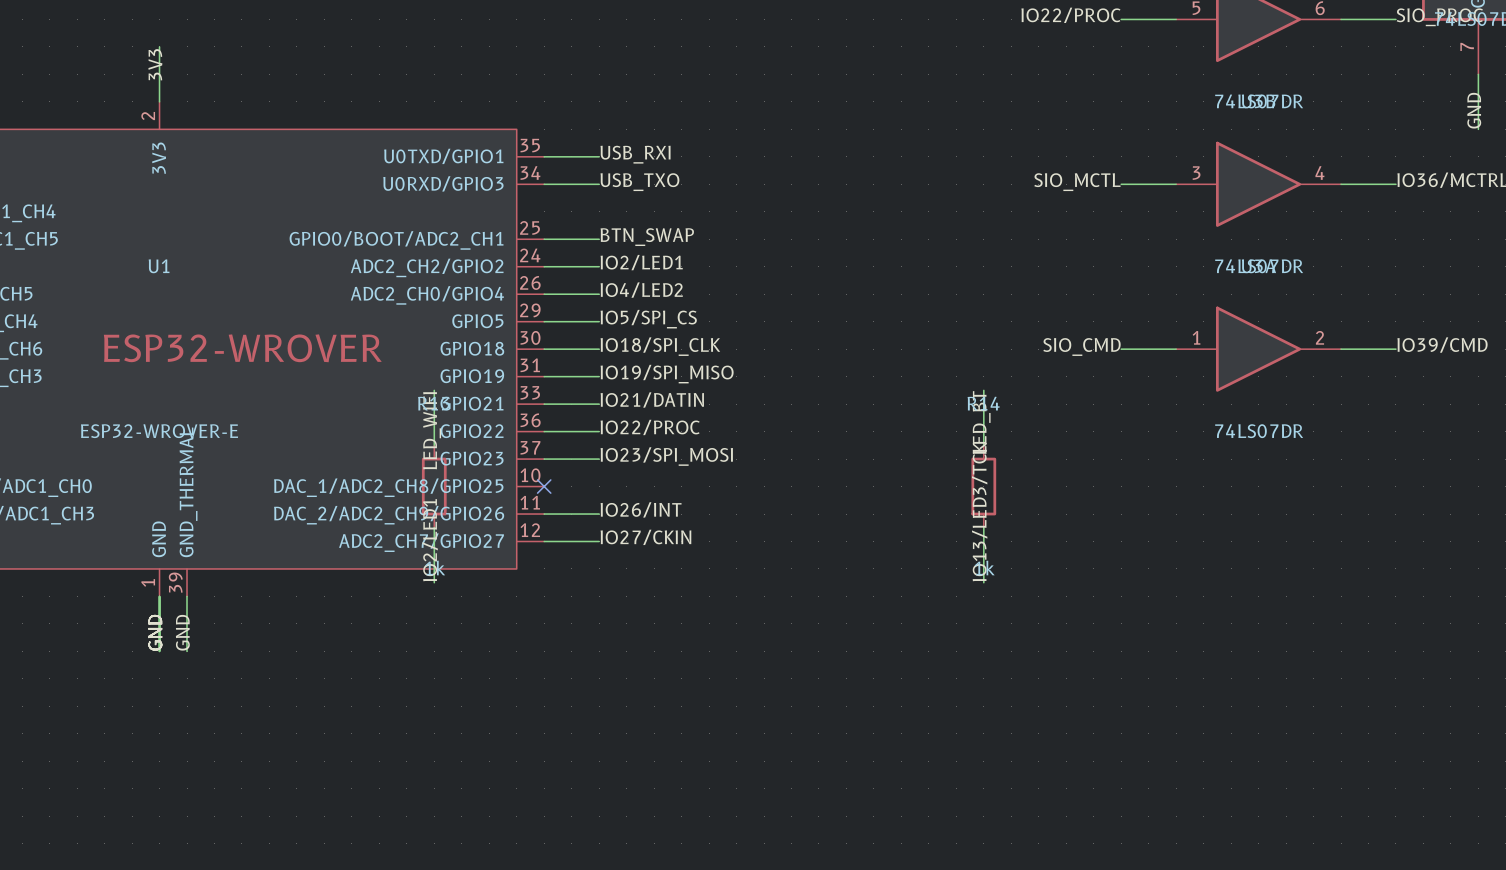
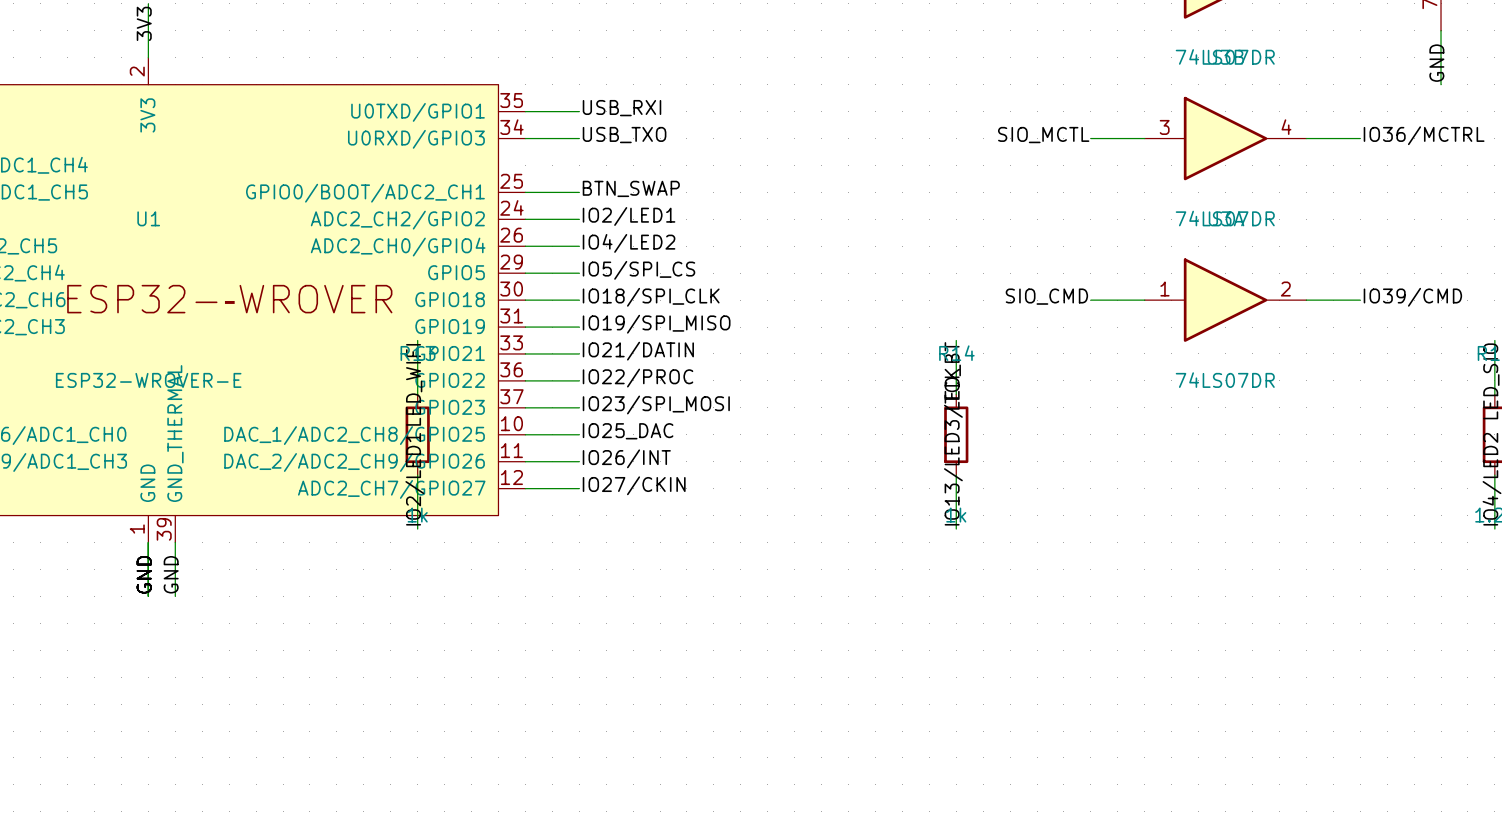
label: none -> IO25_DAC (628, 431)
wire: none -> (525, 434) (579, 434)
no-connect mark: (544, 486) -> none

